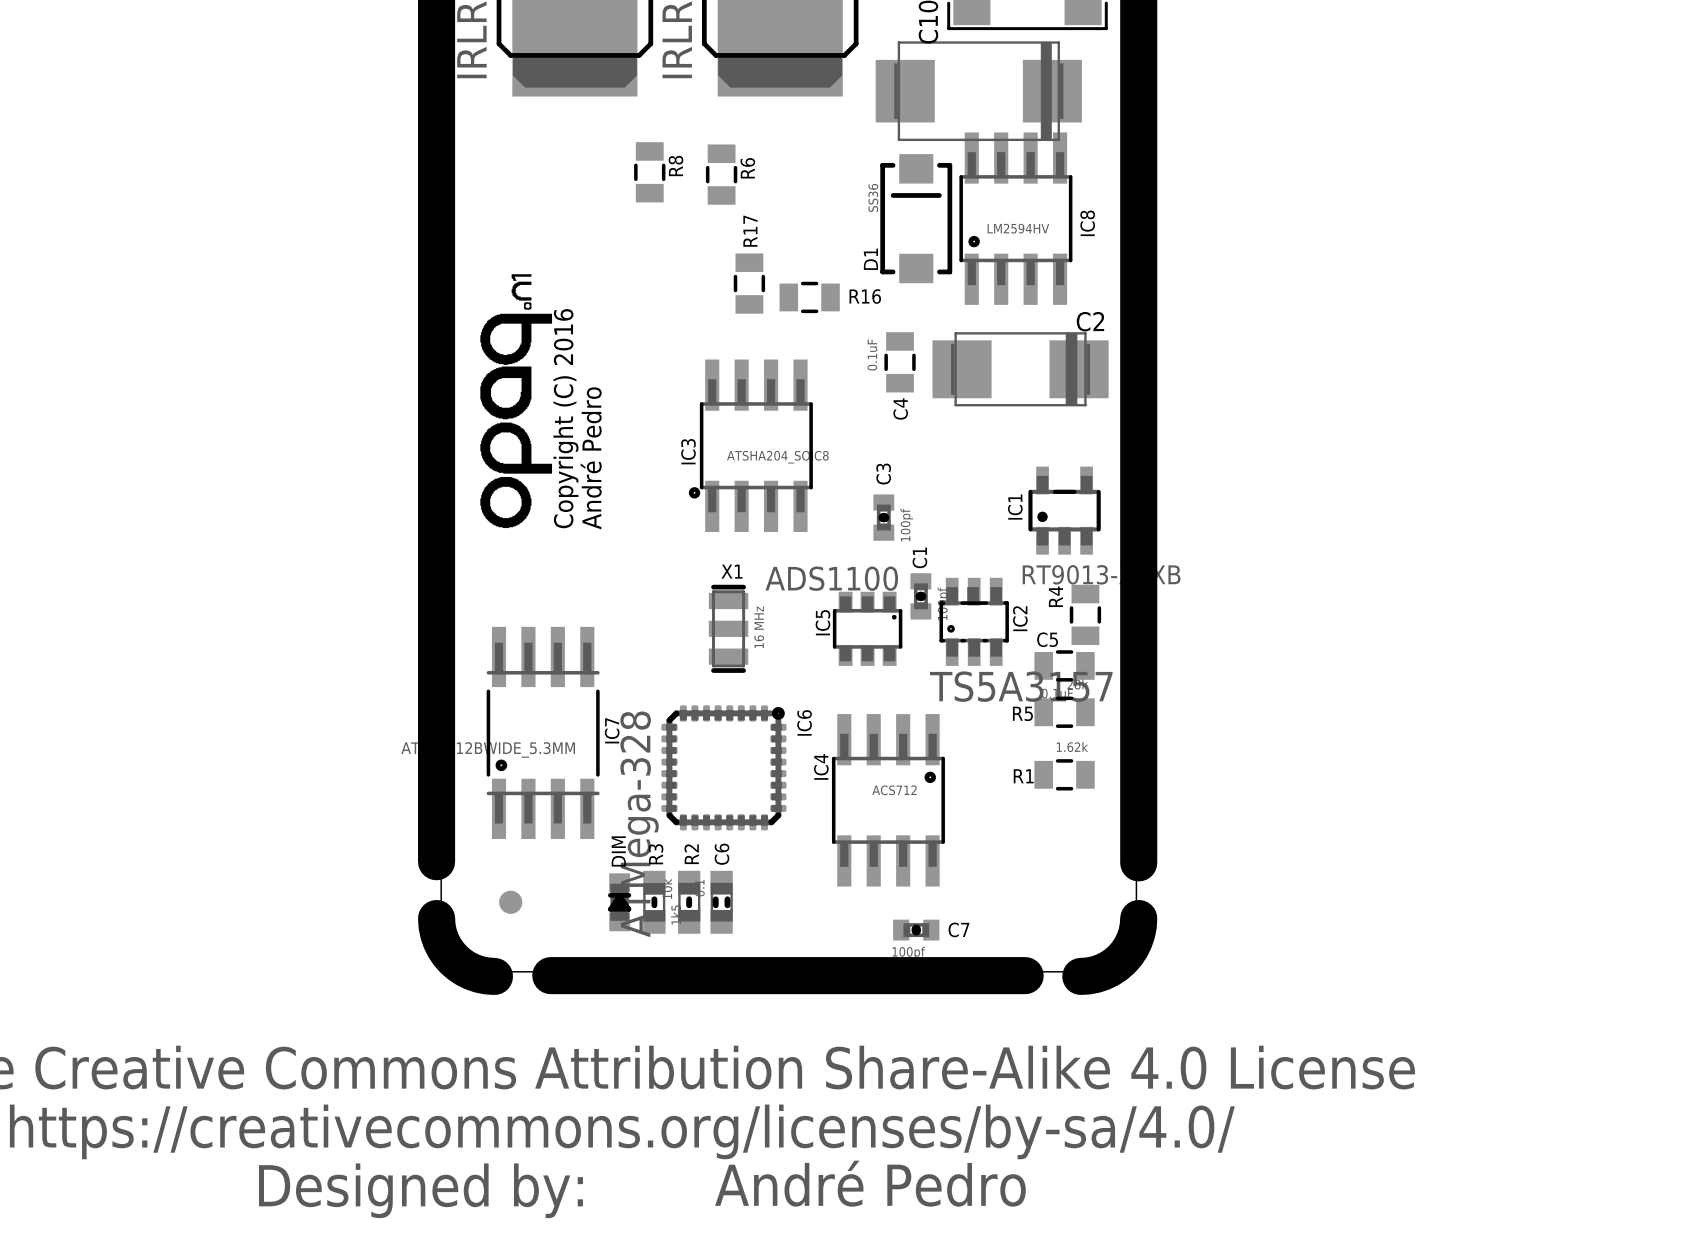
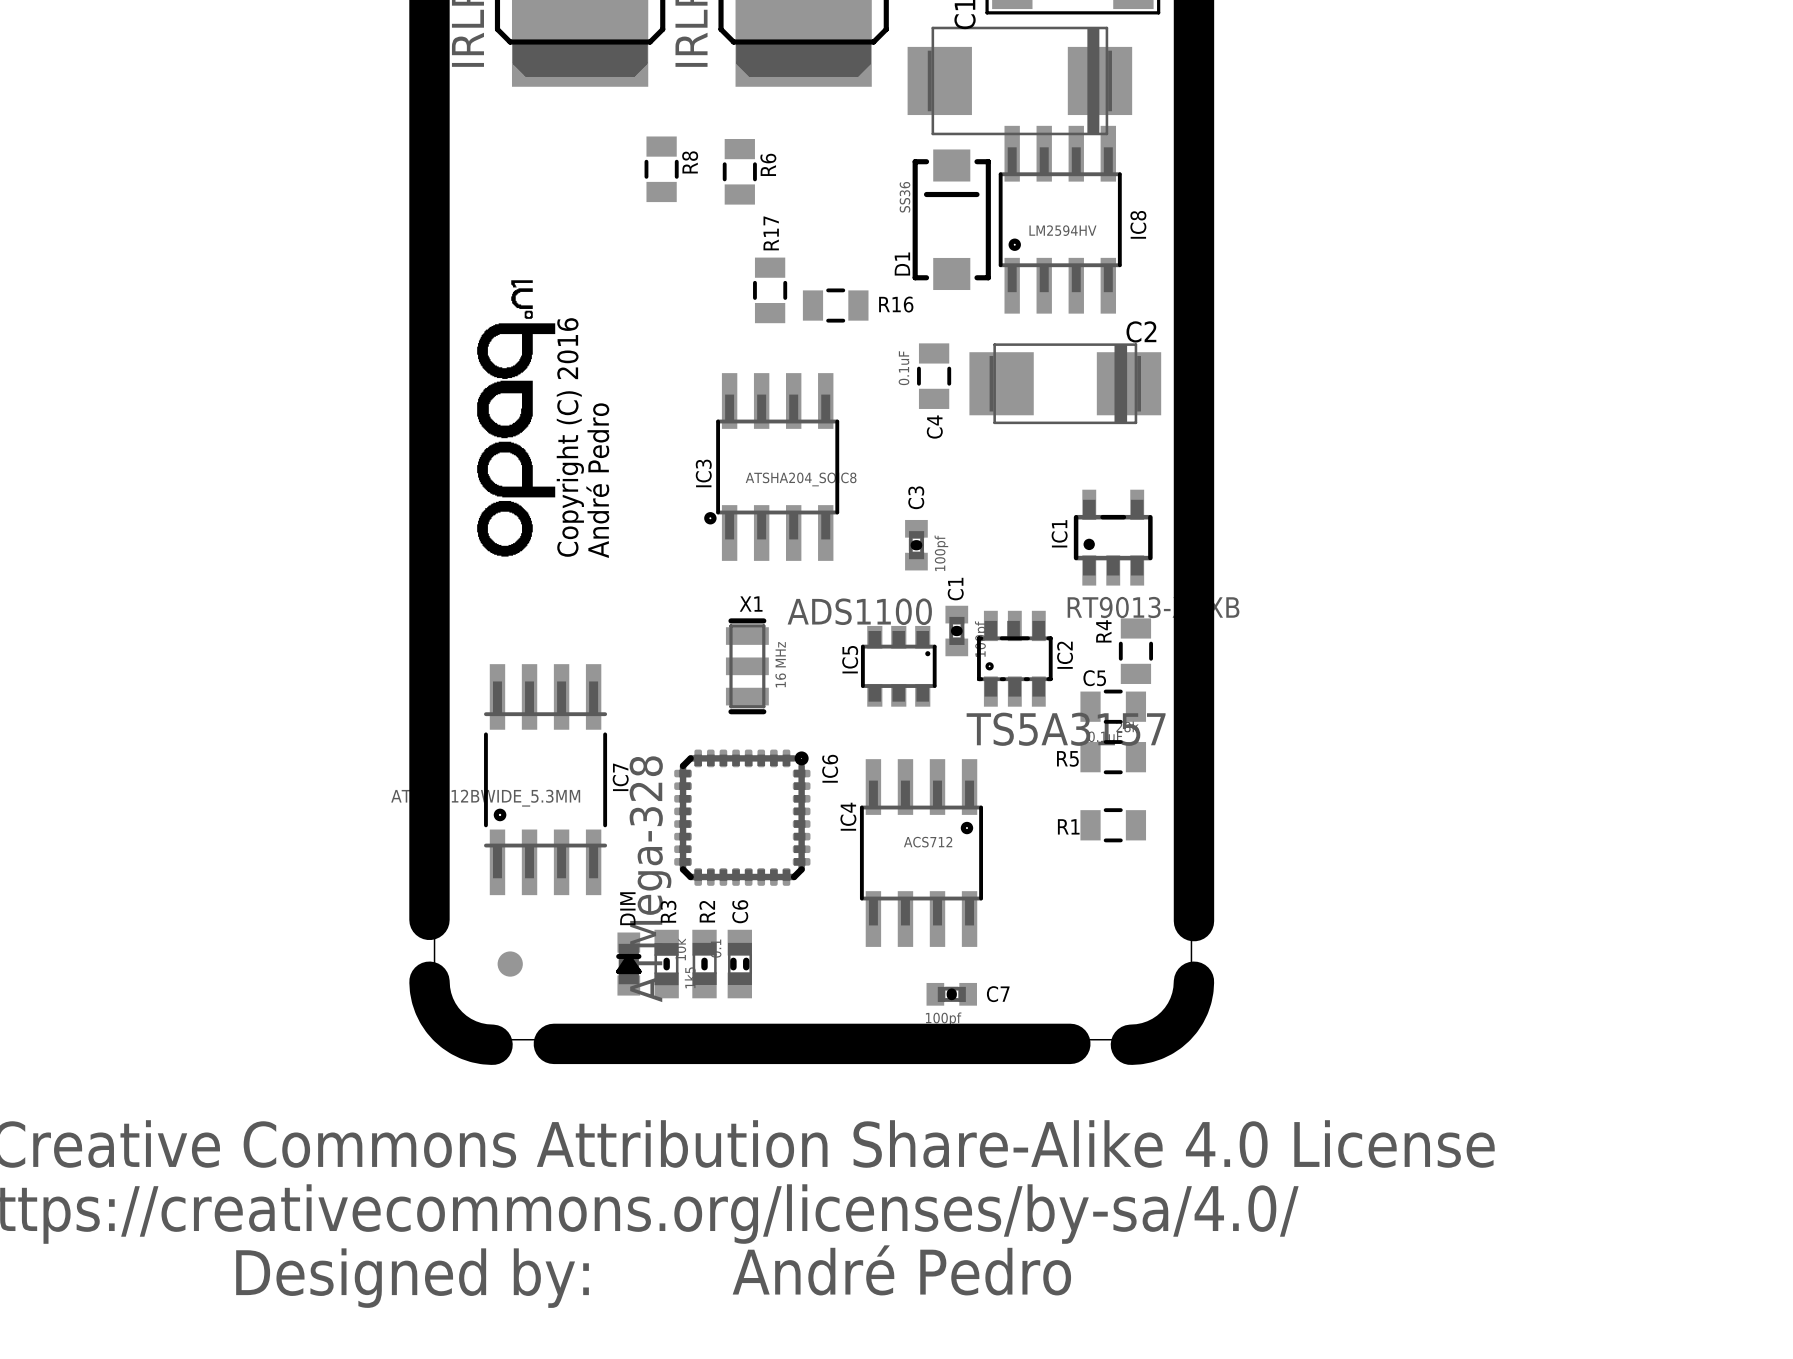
R1 value: 1.62k (1072, 747) -> none

